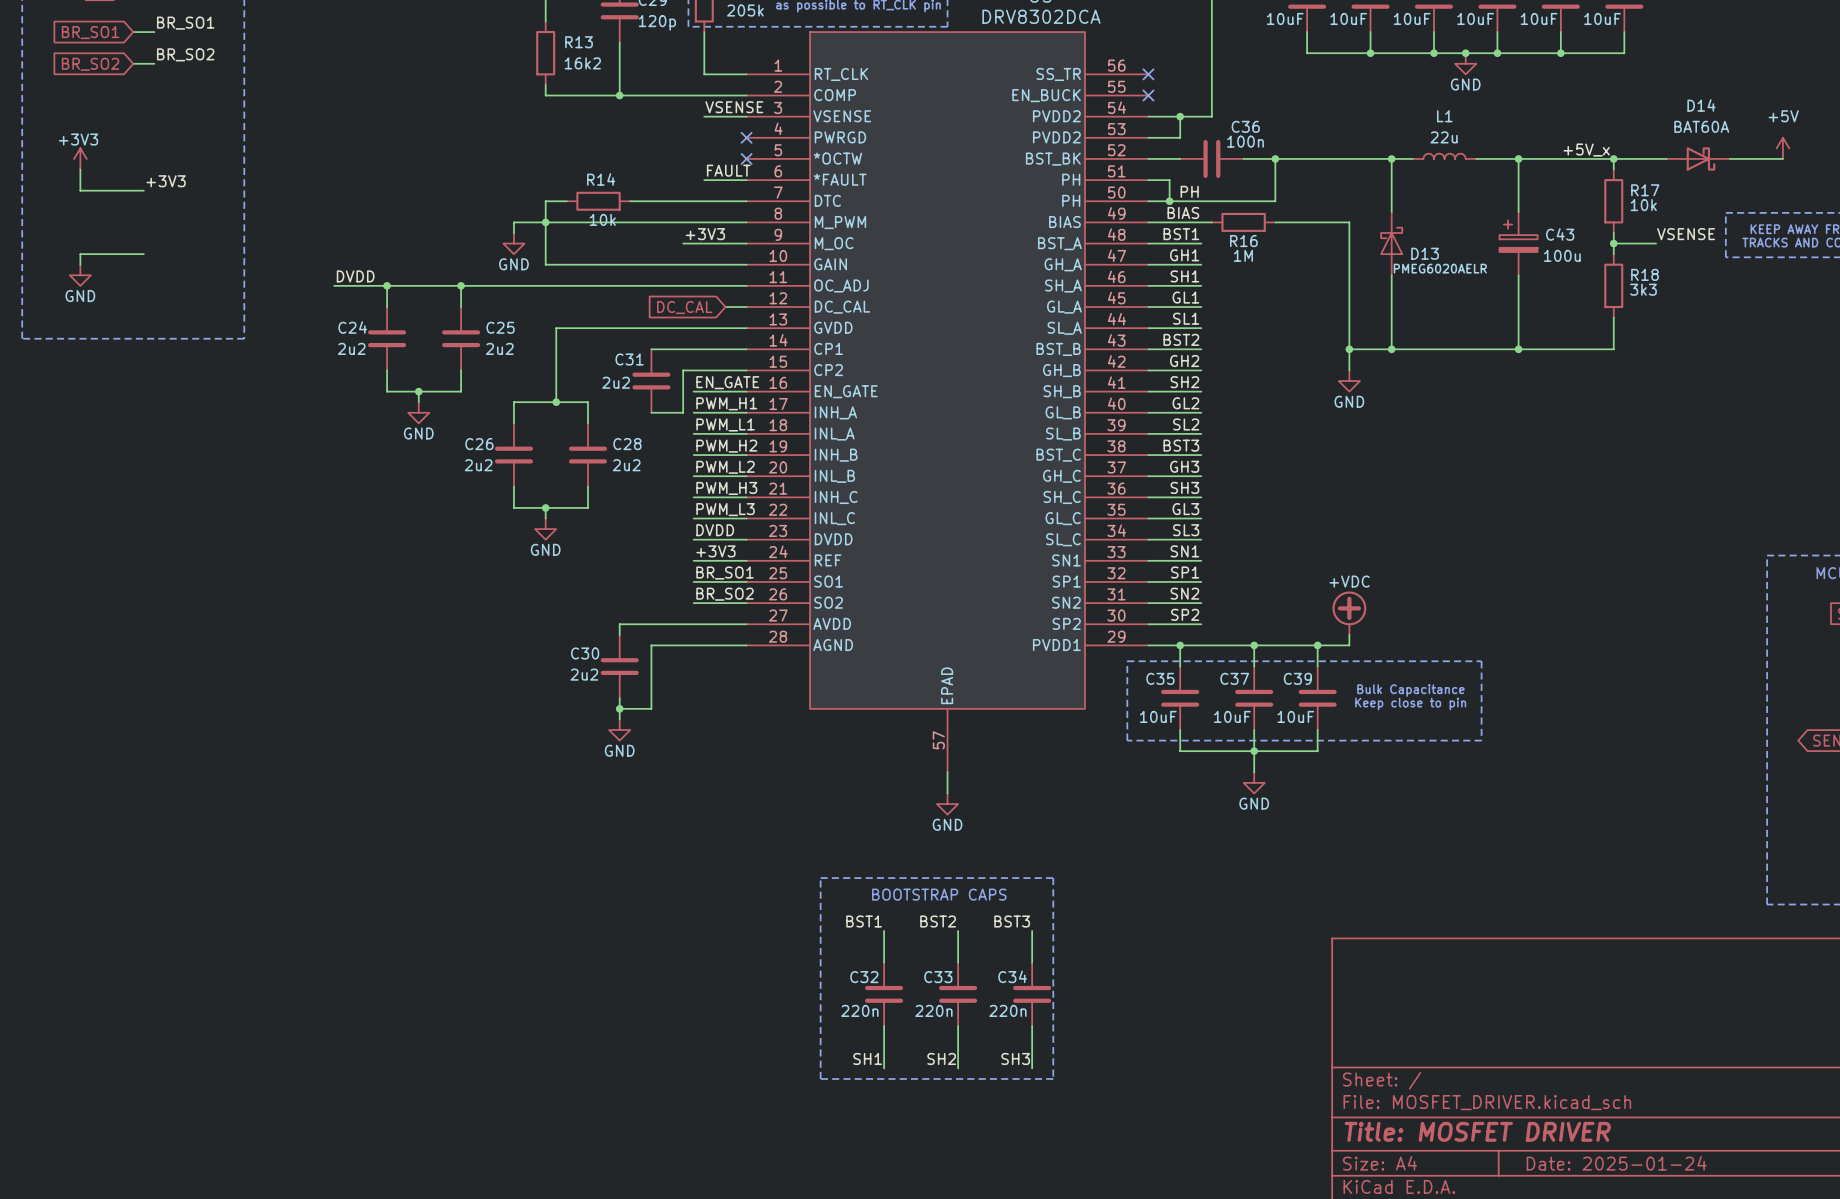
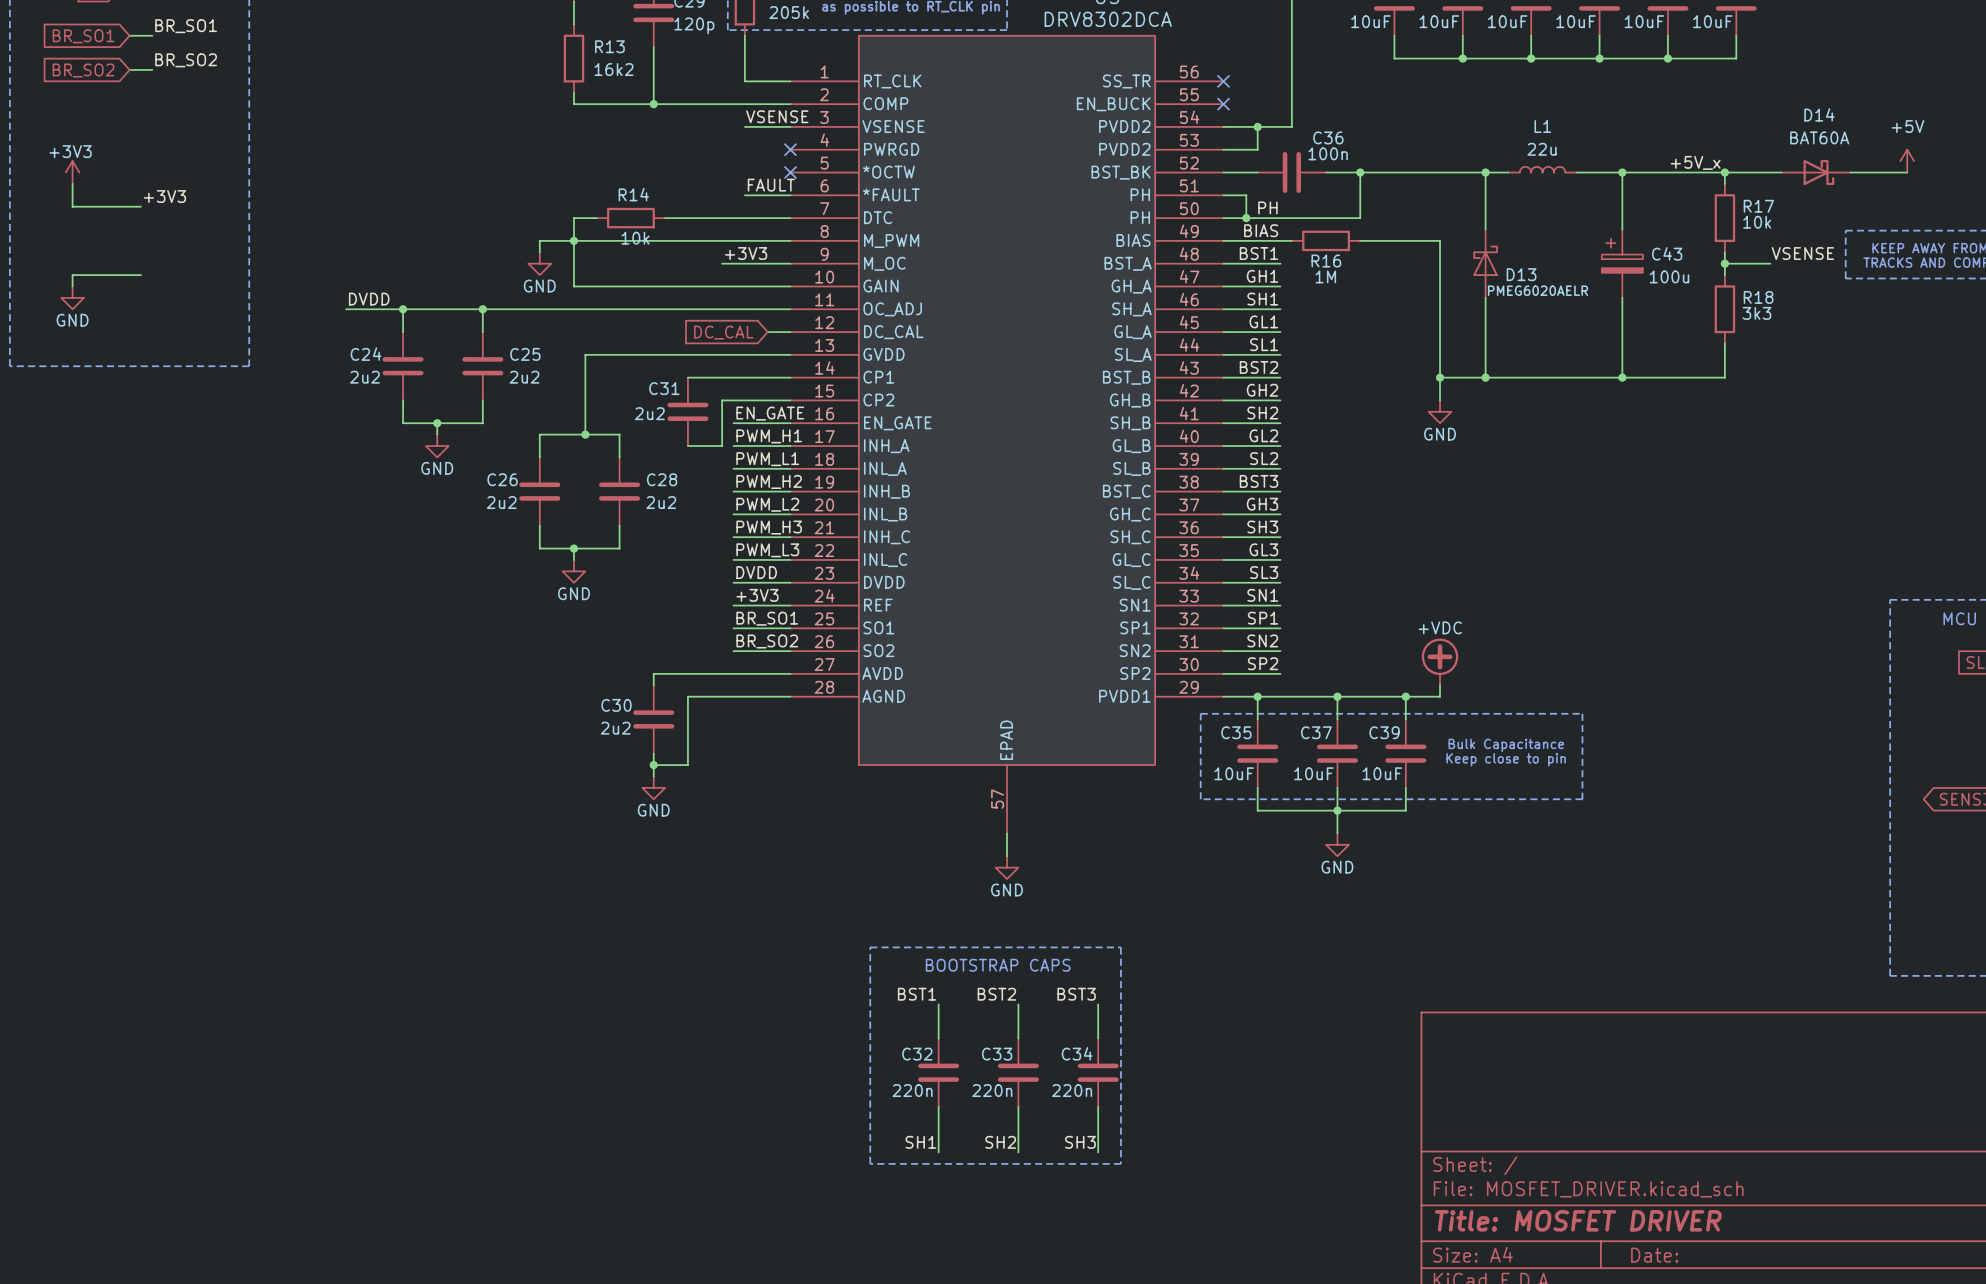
junction: (1465, 53) -> none
power symbol: GND (1465, 63) -> none
title block: Date: 2025-01-24 (1616, 1163) -> Date: (1654, 1255)

